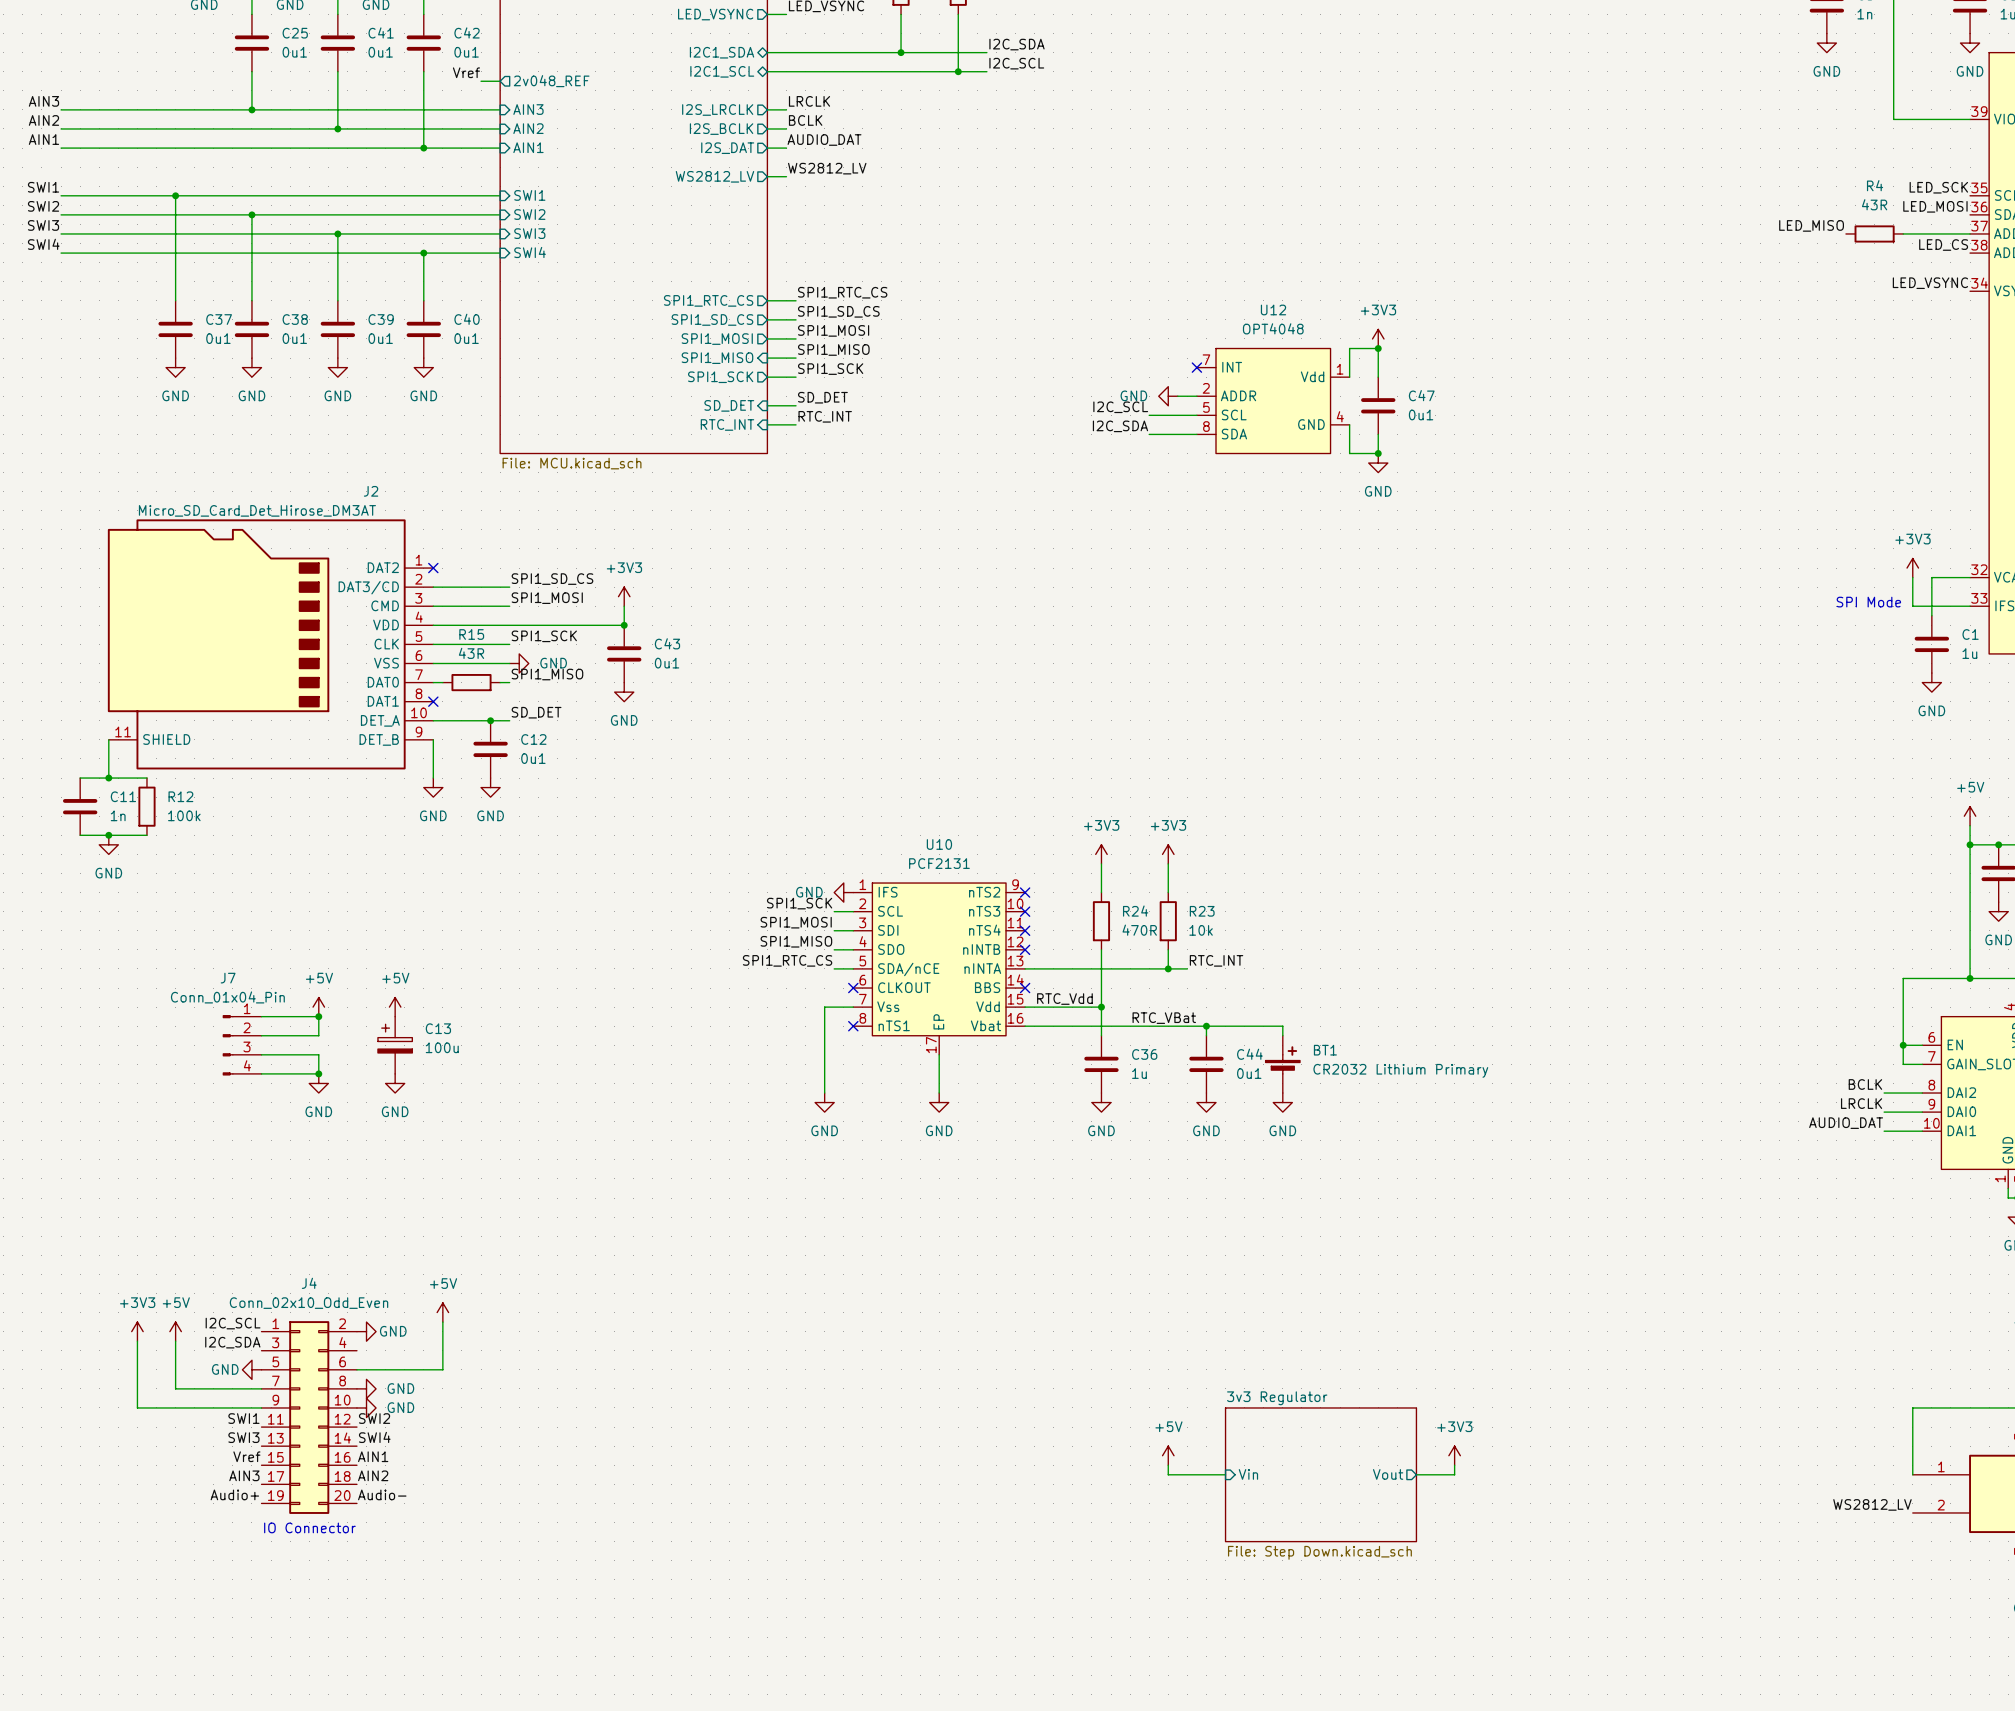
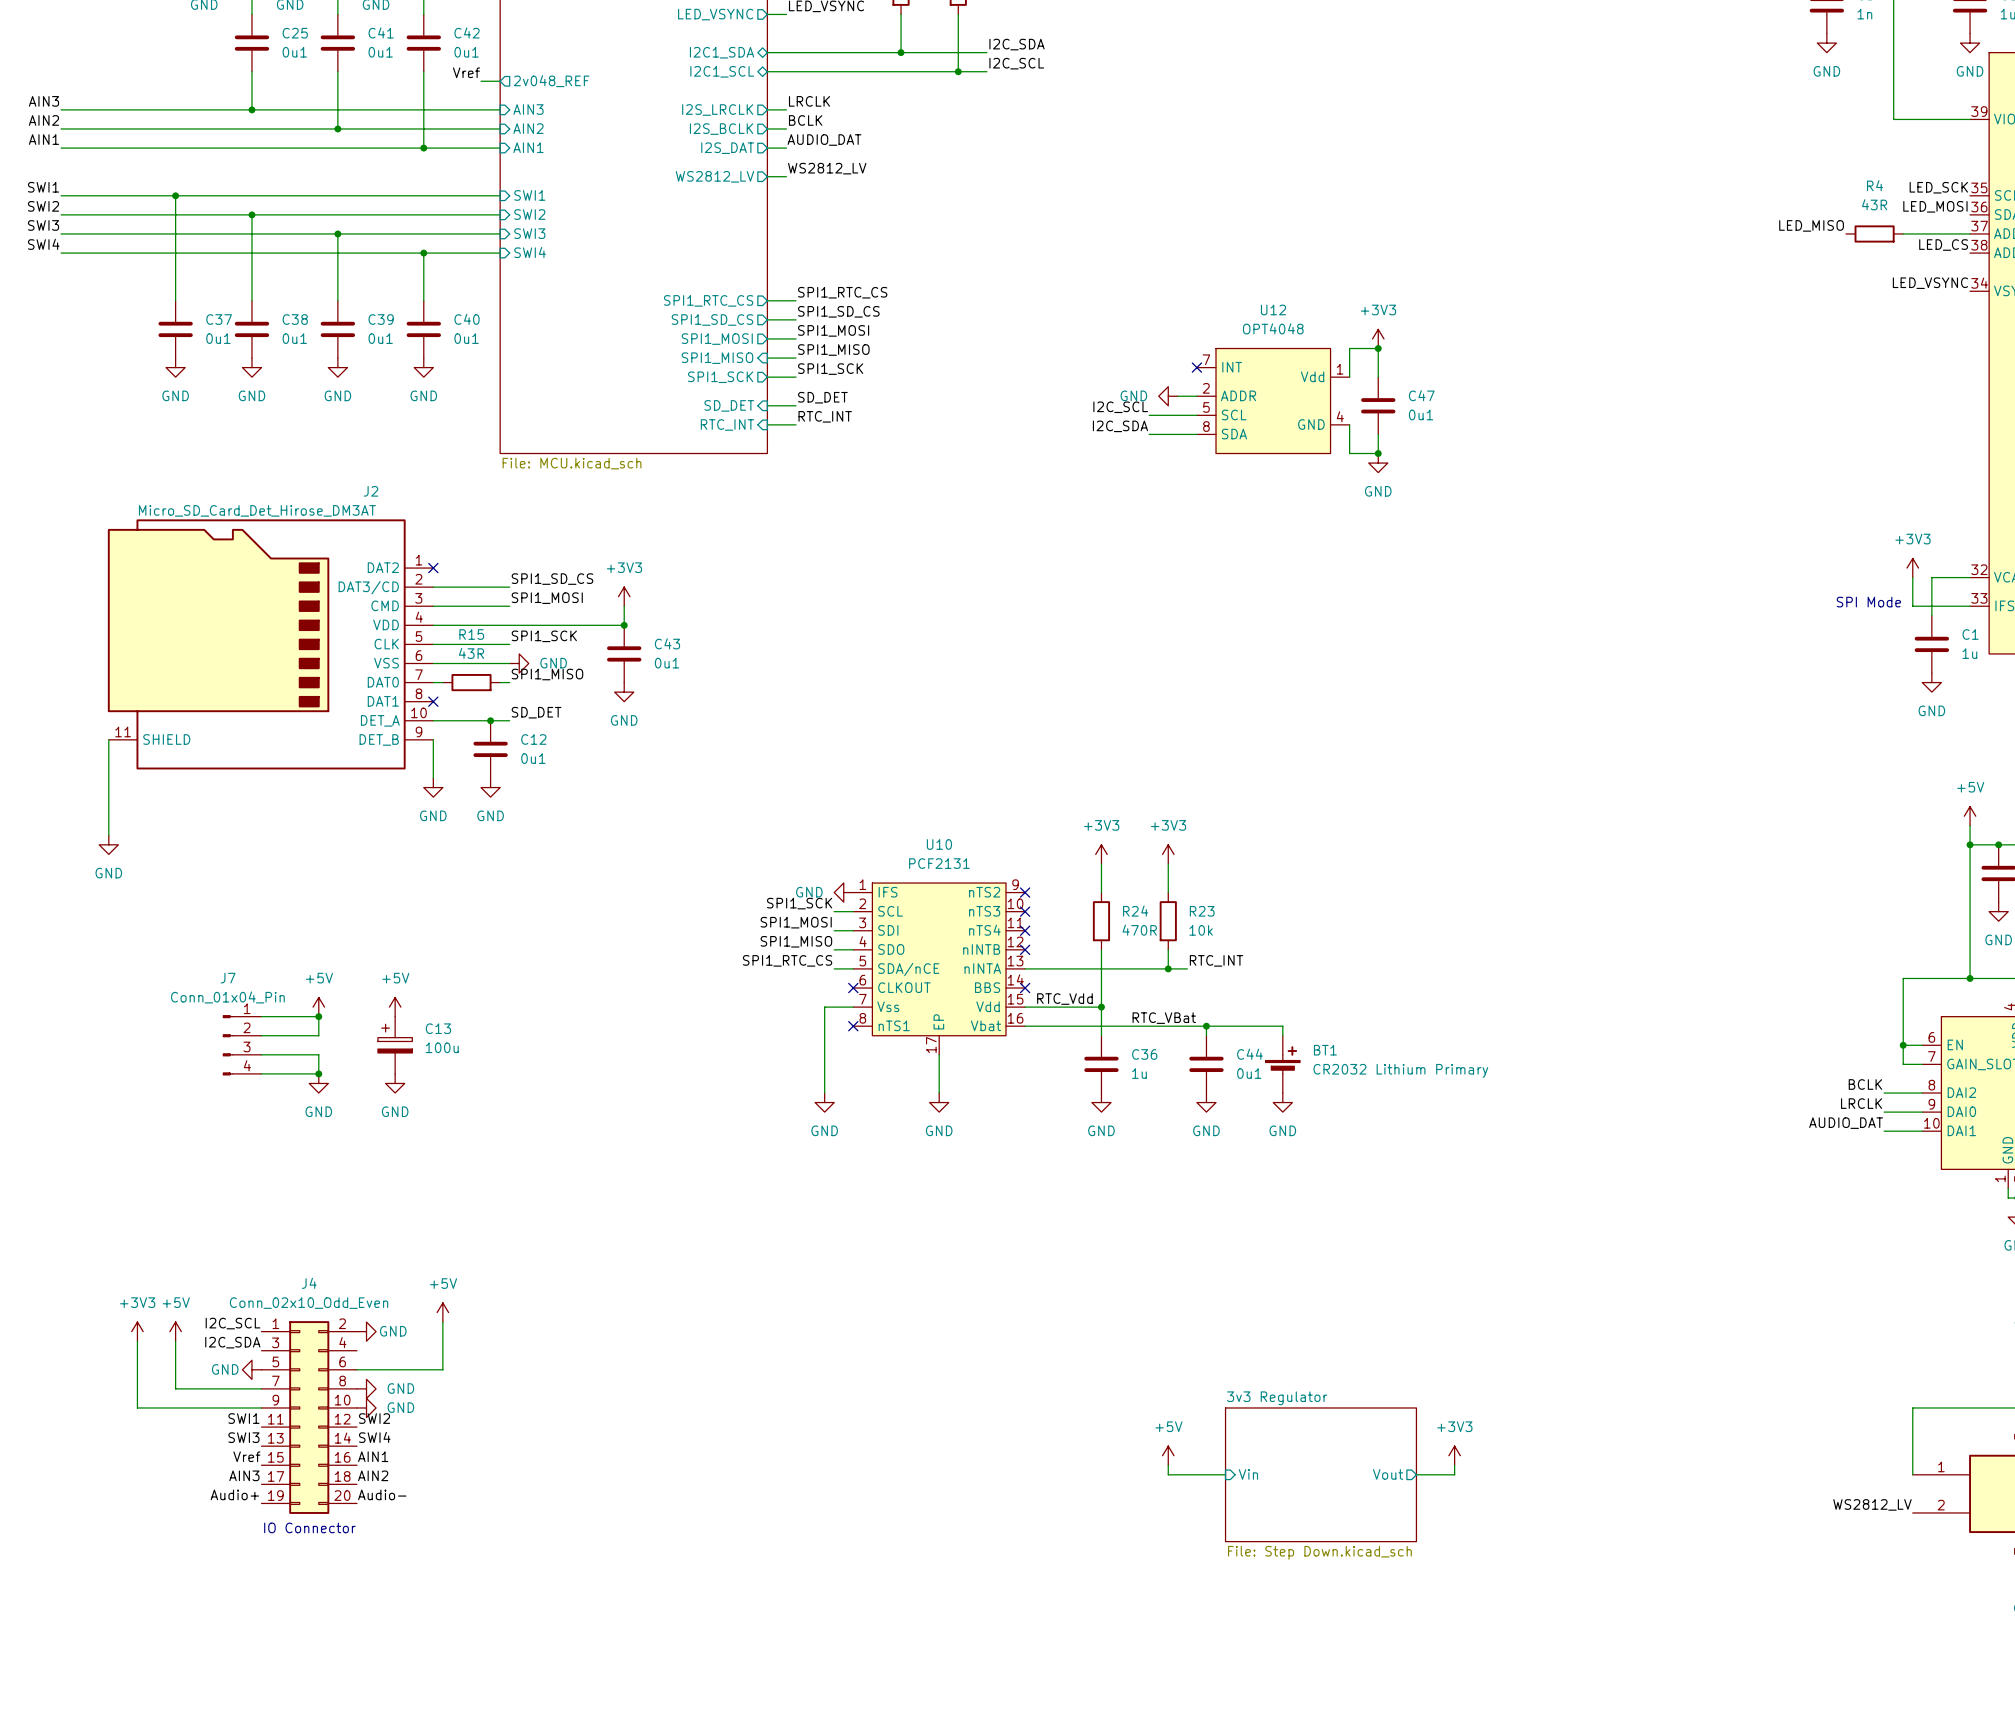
wire: (80, 778) (146, 778) -> none
wire: none -> (108, 778) (108, 835)
junction: (108, 778) -> none
C11: 1n (80, 806) -> none
R12: 100k (146, 806) -> none
wire: (80, 835) (146, 835) -> none
junction: (108, 835) -> none

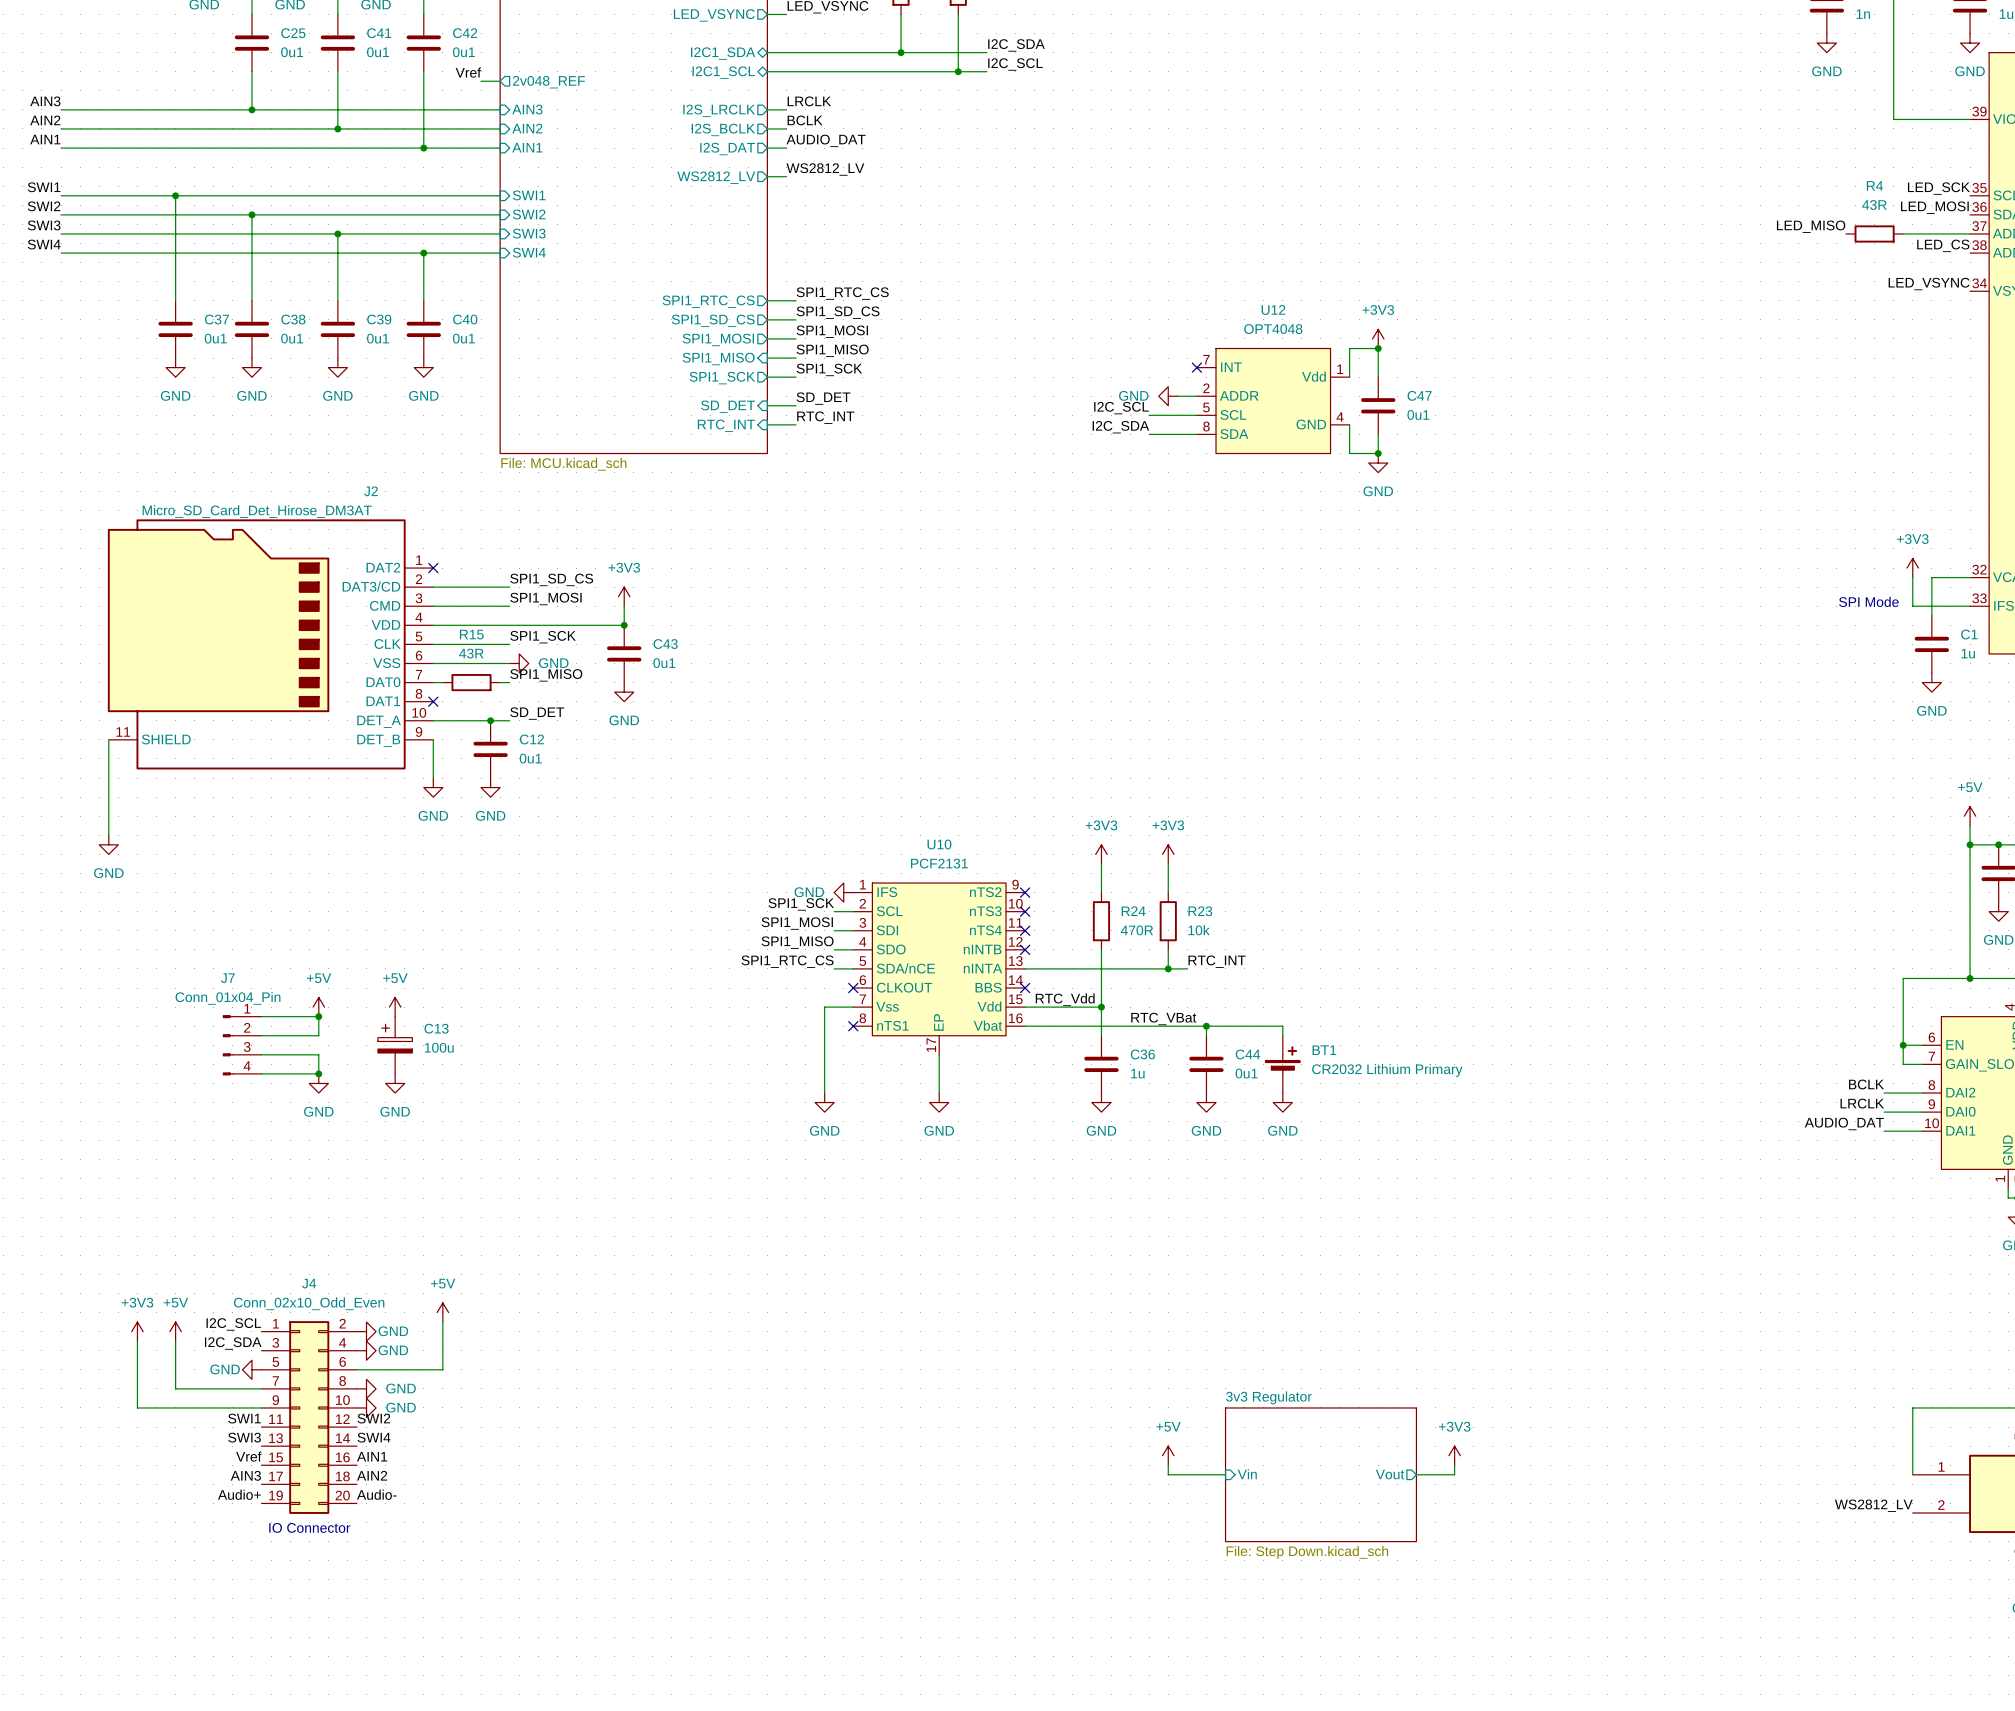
power symbol: none -> GND (366, 1350)

